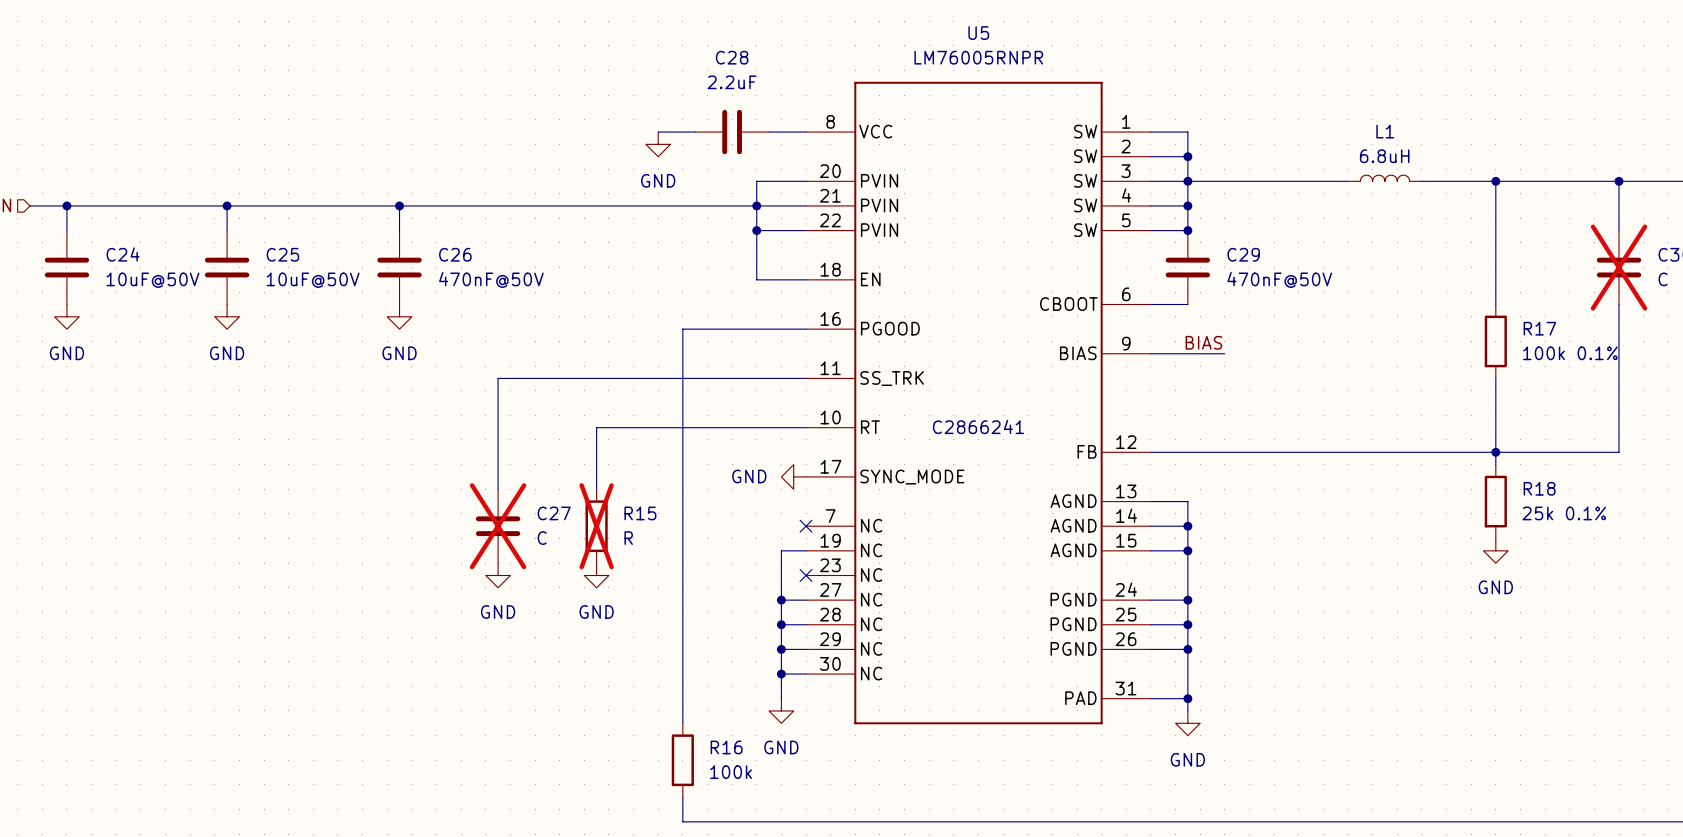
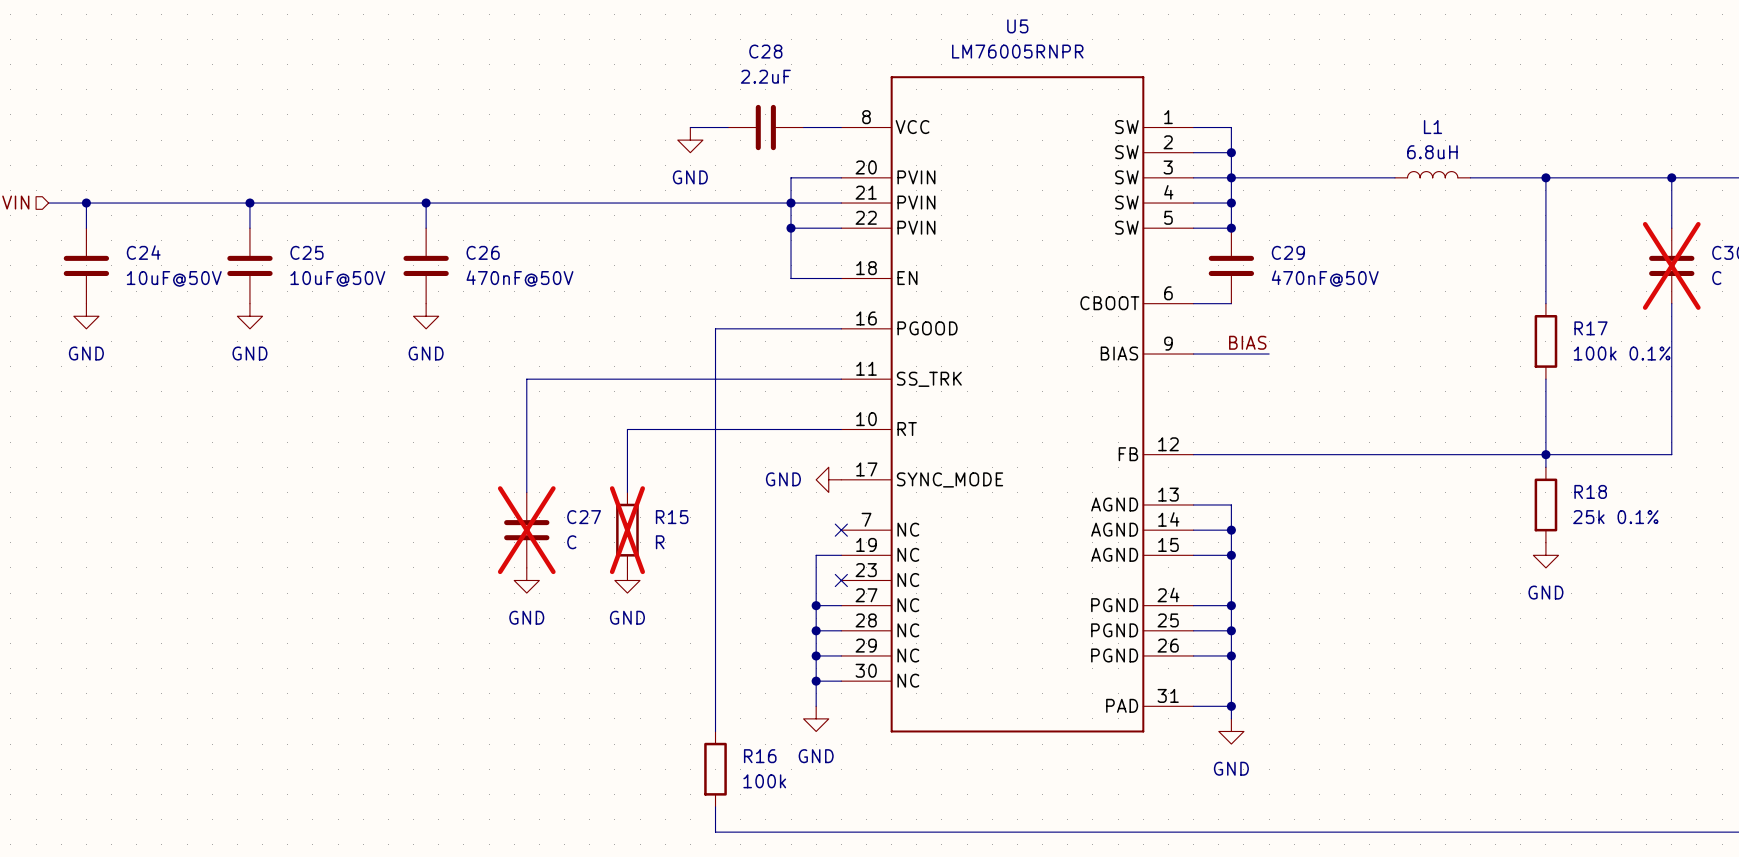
U5 text: C2866241 (978, 426) -> none

